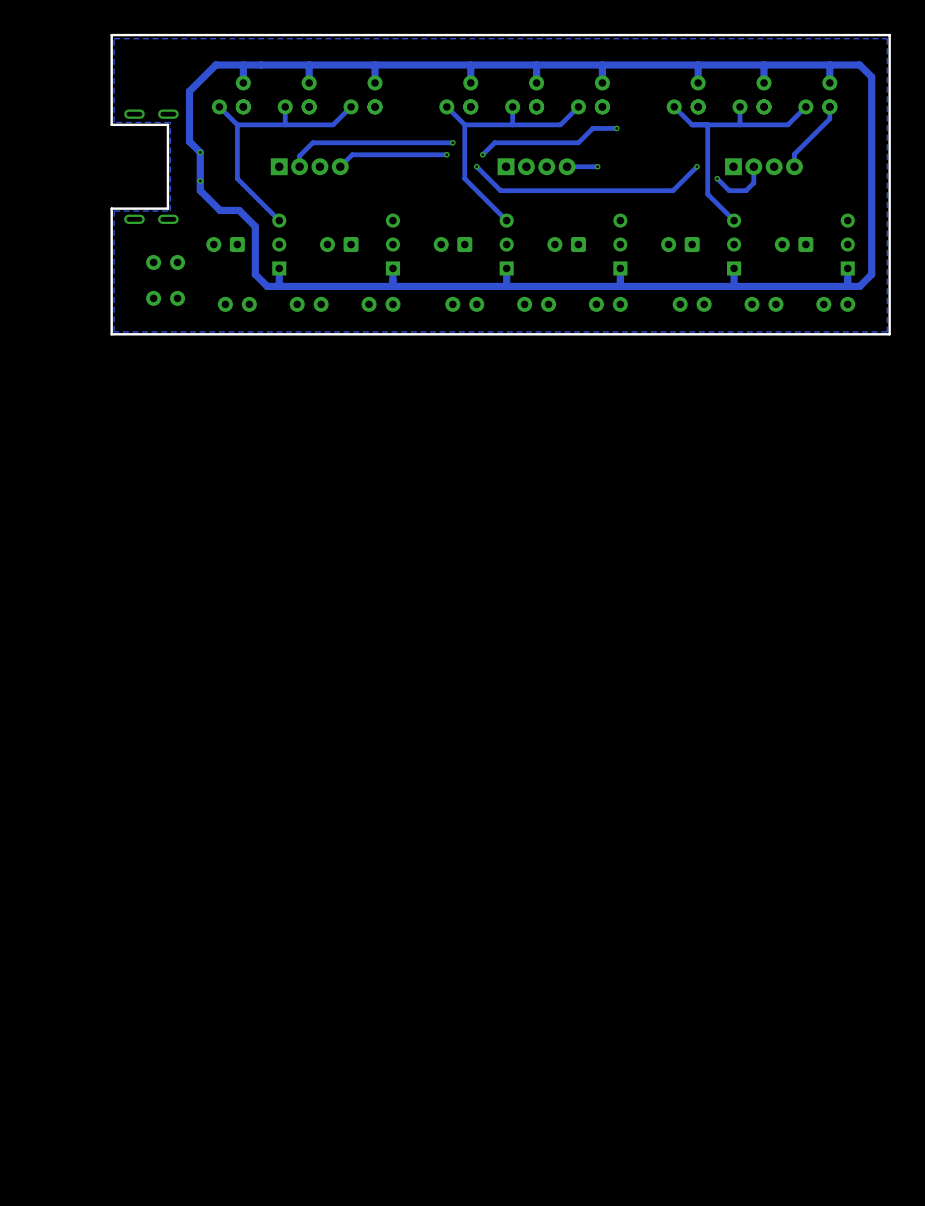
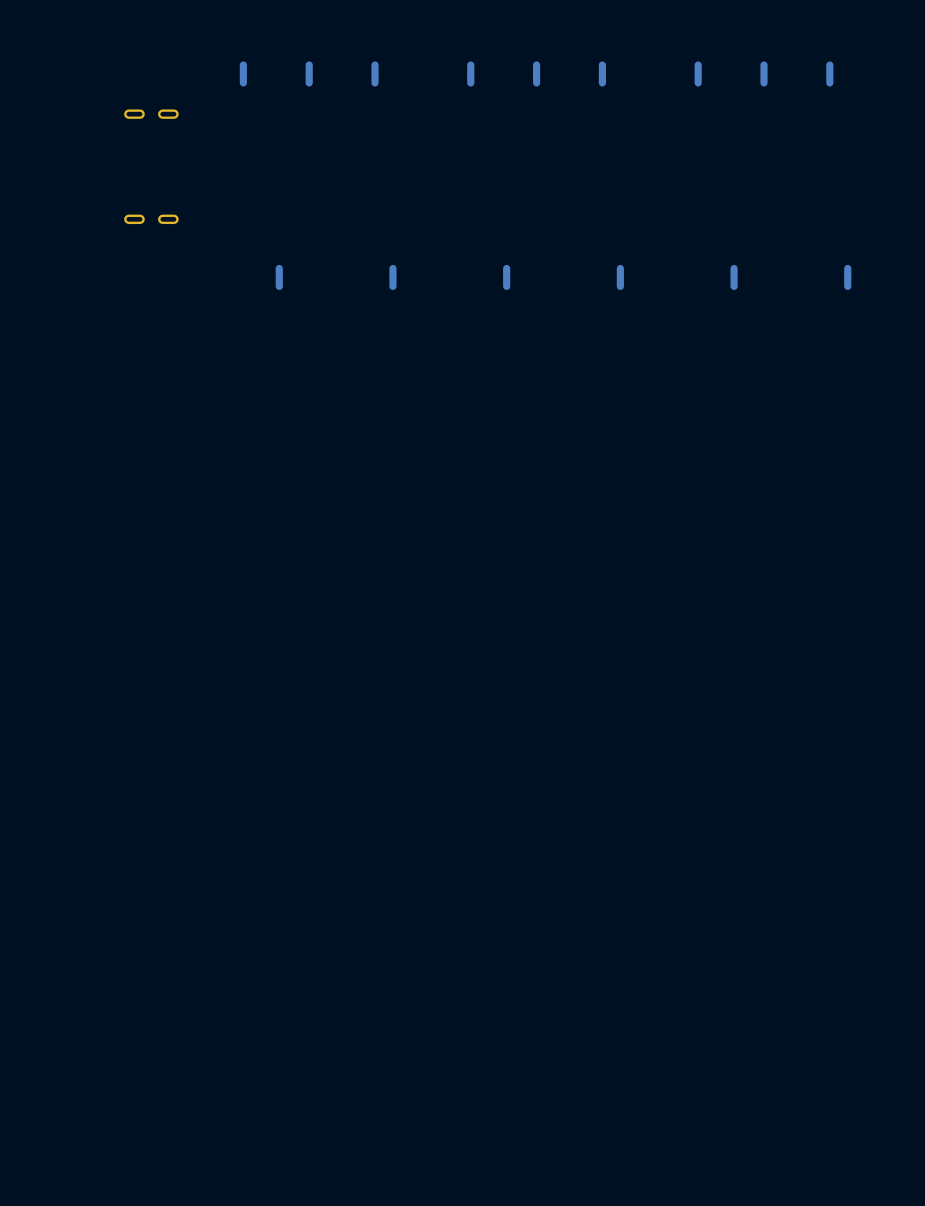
board edge: (889, 35) (111, 35) (111, 124) (167, 124) (167, 208) (111, 208) (111, 334) (889, 334) (889, 35) -> none
zone outline: (887, 38) (887, 331) (114, 331) (114, 211) (170, 211) (170, 122) (114, 122) (114, 38) (887, 38) -> none
track: (859, 65) (215, 65) (189, 91) (189, 141) (200, 152) (200, 190) (220, 210) (239, 210) (255, 226) (255, 274) (267, 286) (859, 286) (871, 274) (871, 76) (859, 65) -> none
part: (243, 94) -> none
part: (309, 94) -> none
part: (375, 94) -> none
part: (470, 94) -> none
part: (536, 94) -> none
part: (602, 94) -> none
part: (698, 94) -> none
part: (763, 94) -> none
part: (829, 94) -> none
track: (219, 106) (237, 124) -> none
part: (231, 106) -> none
track: (285, 106) (285, 124) -> none
part: (297, 106) -> none
track: (351, 106) (333, 124) (237, 124) -> none
part: (363, 106) -> none
track: (446, 106) (464, 124) -> none
part: (458, 106) -> none
track: (512, 106) (512, 124) -> none
part: (524, 106) -> none
track: (578, 106) (560, 124) (464, 124) -> none
part: (590, 106) -> none
part: (686, 106) -> none
track: (740, 106) (740, 124) -> none
part: (752, 106) -> none
track: (805, 106) (787, 124) (692, 124) (674, 106) -> none
part: (817, 106) -> none
track: (829, 106) (829, 118) (794, 154) (794, 166) -> none
track: (237, 124) (237, 178) (279, 220) -> none
track: (464, 124) (464, 178) (506, 220) -> none
track: (707, 124) (707, 194) (734, 220) -> none
track: (616, 128) (592, 128) (578, 142) (494, 142) (482, 154) -> none
via: (616, 128) -> none
track: (452, 142) (312, 142) (299, 155) (299, 166) -> none
via: (452, 142) -> none
via: (200, 152) -> none
track: (446, 154) (352, 154) (340, 166) -> none
via: (446, 154) -> none
via: (482, 154) -> none
part: (309, 166) -> none
via: (476, 166) -> none
part: (536, 166) -> none
track: (597, 166) (567, 166) -> none
via: (597, 166) -> none
track: (696, 166) (673, 190) (500, 190) (476, 166) -> none
via: (696, 166) -> none
track: (753, 166) (753, 182) (746, 190) (729, 190) (717, 178) -> none
part: (763, 166) -> none
via: (717, 178) -> none
via: (200, 181) -> none
part: (225, 244) -> none
part: (279, 244) -> none
part: (339, 244) -> none
part: (392, 244) -> none
part: (453, 244) -> none
part: (506, 244) -> none
part: (566, 244) -> none
part: (620, 244) -> none
part: (680, 244) -> none
part: (734, 244) -> none
part: (794, 244) -> none
part: (847, 244) -> none
part: (165, 262) -> none
part: (165, 298) -> none
part: (237, 304) -> none
part: (309, 304) -> none
part: (381, 304) -> none
part: (464, 304) -> none
part: (536, 304) -> none
part: (608, 304) -> none
part: (692, 304) -> none
part: (763, 304) -> none
part: (835, 304) -> none

